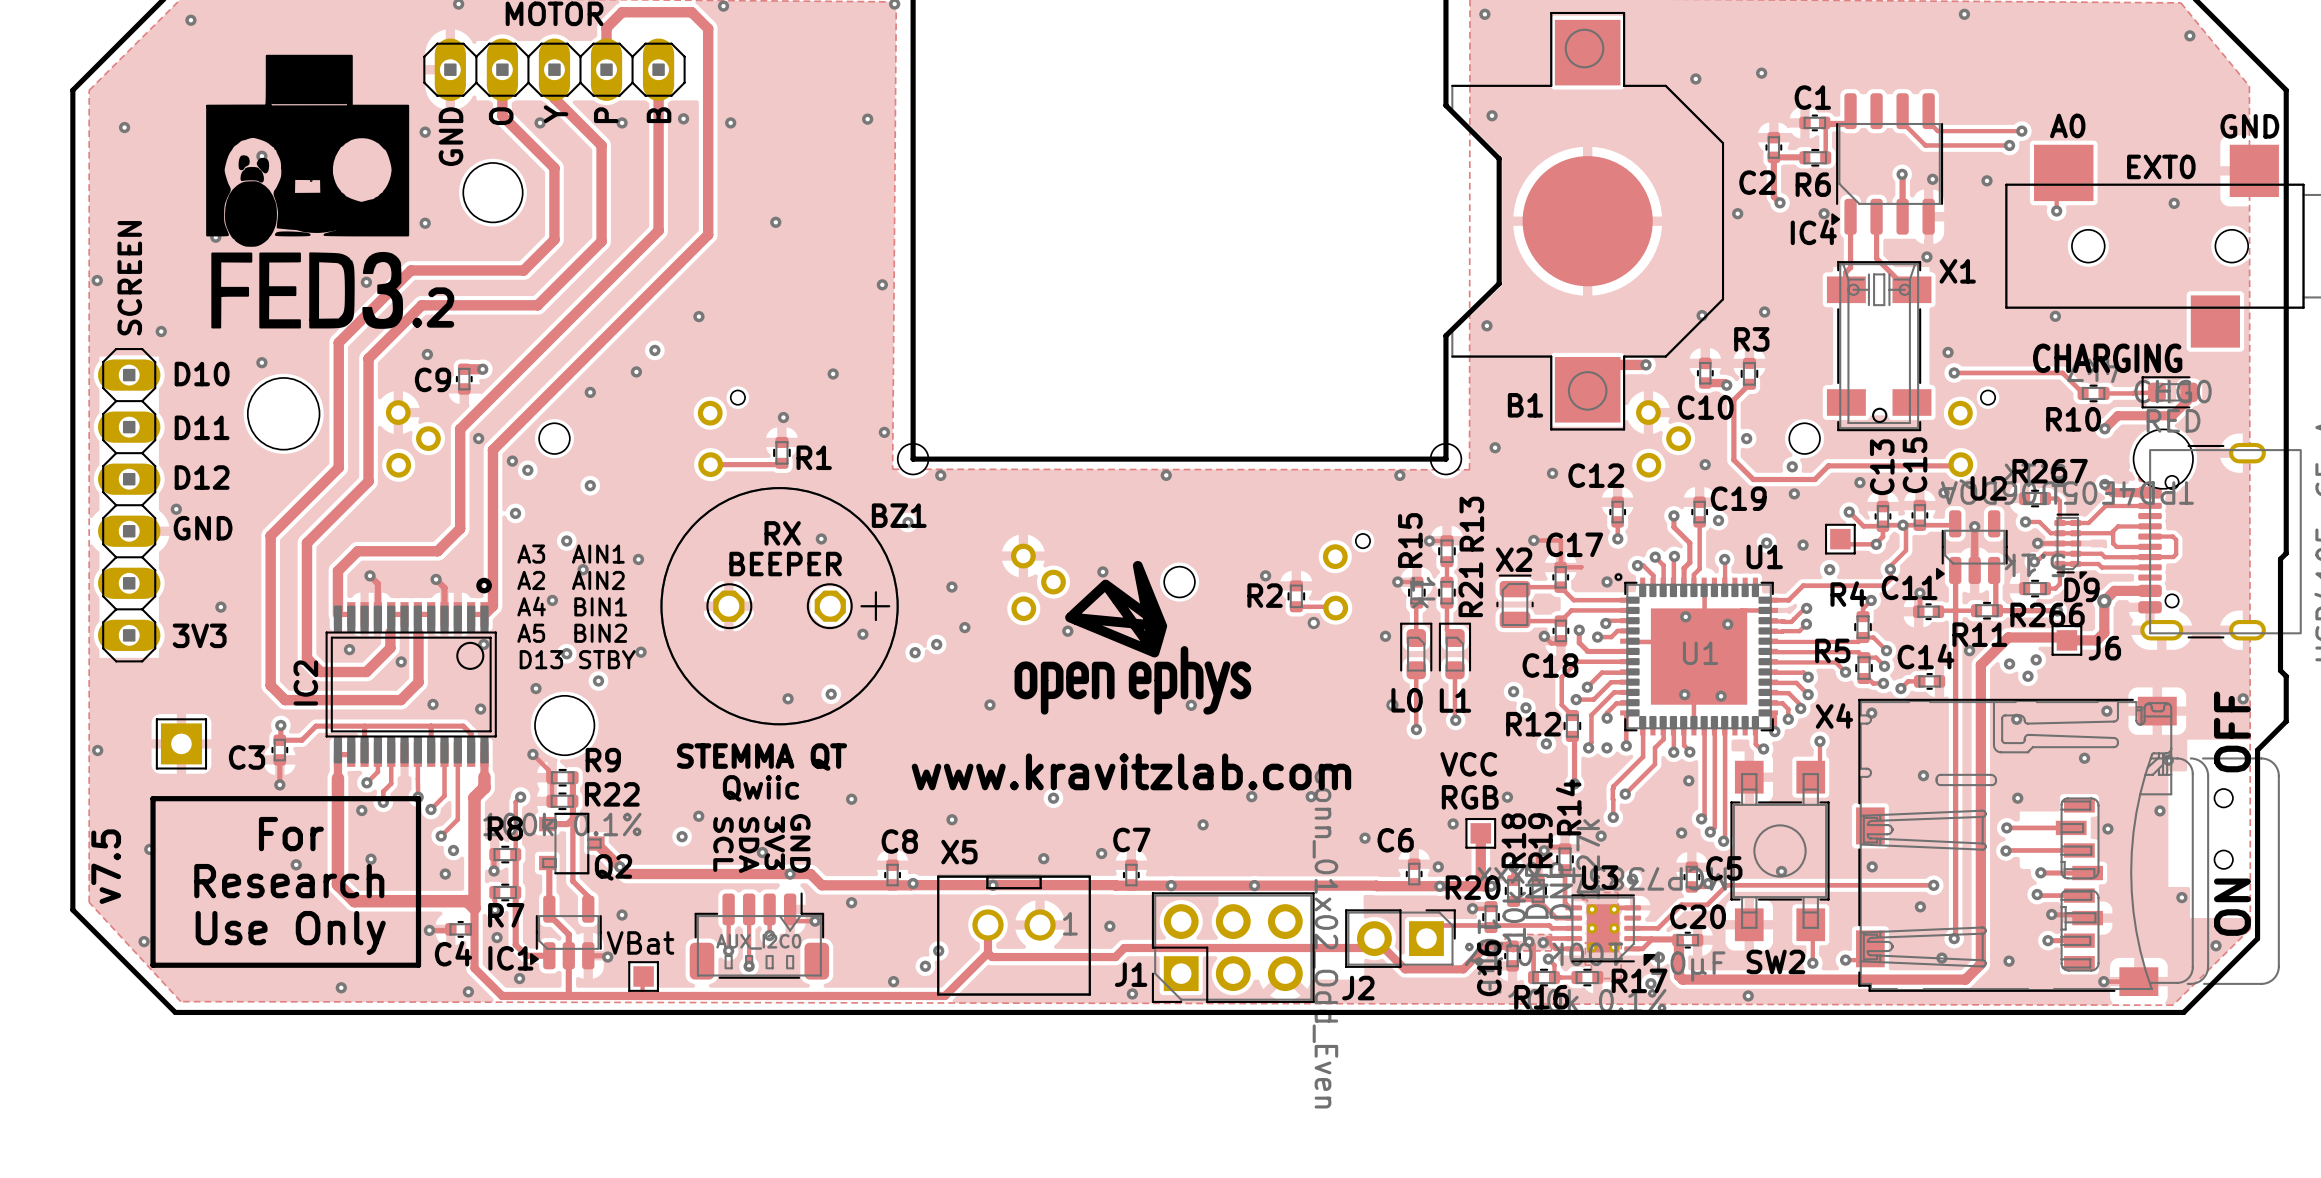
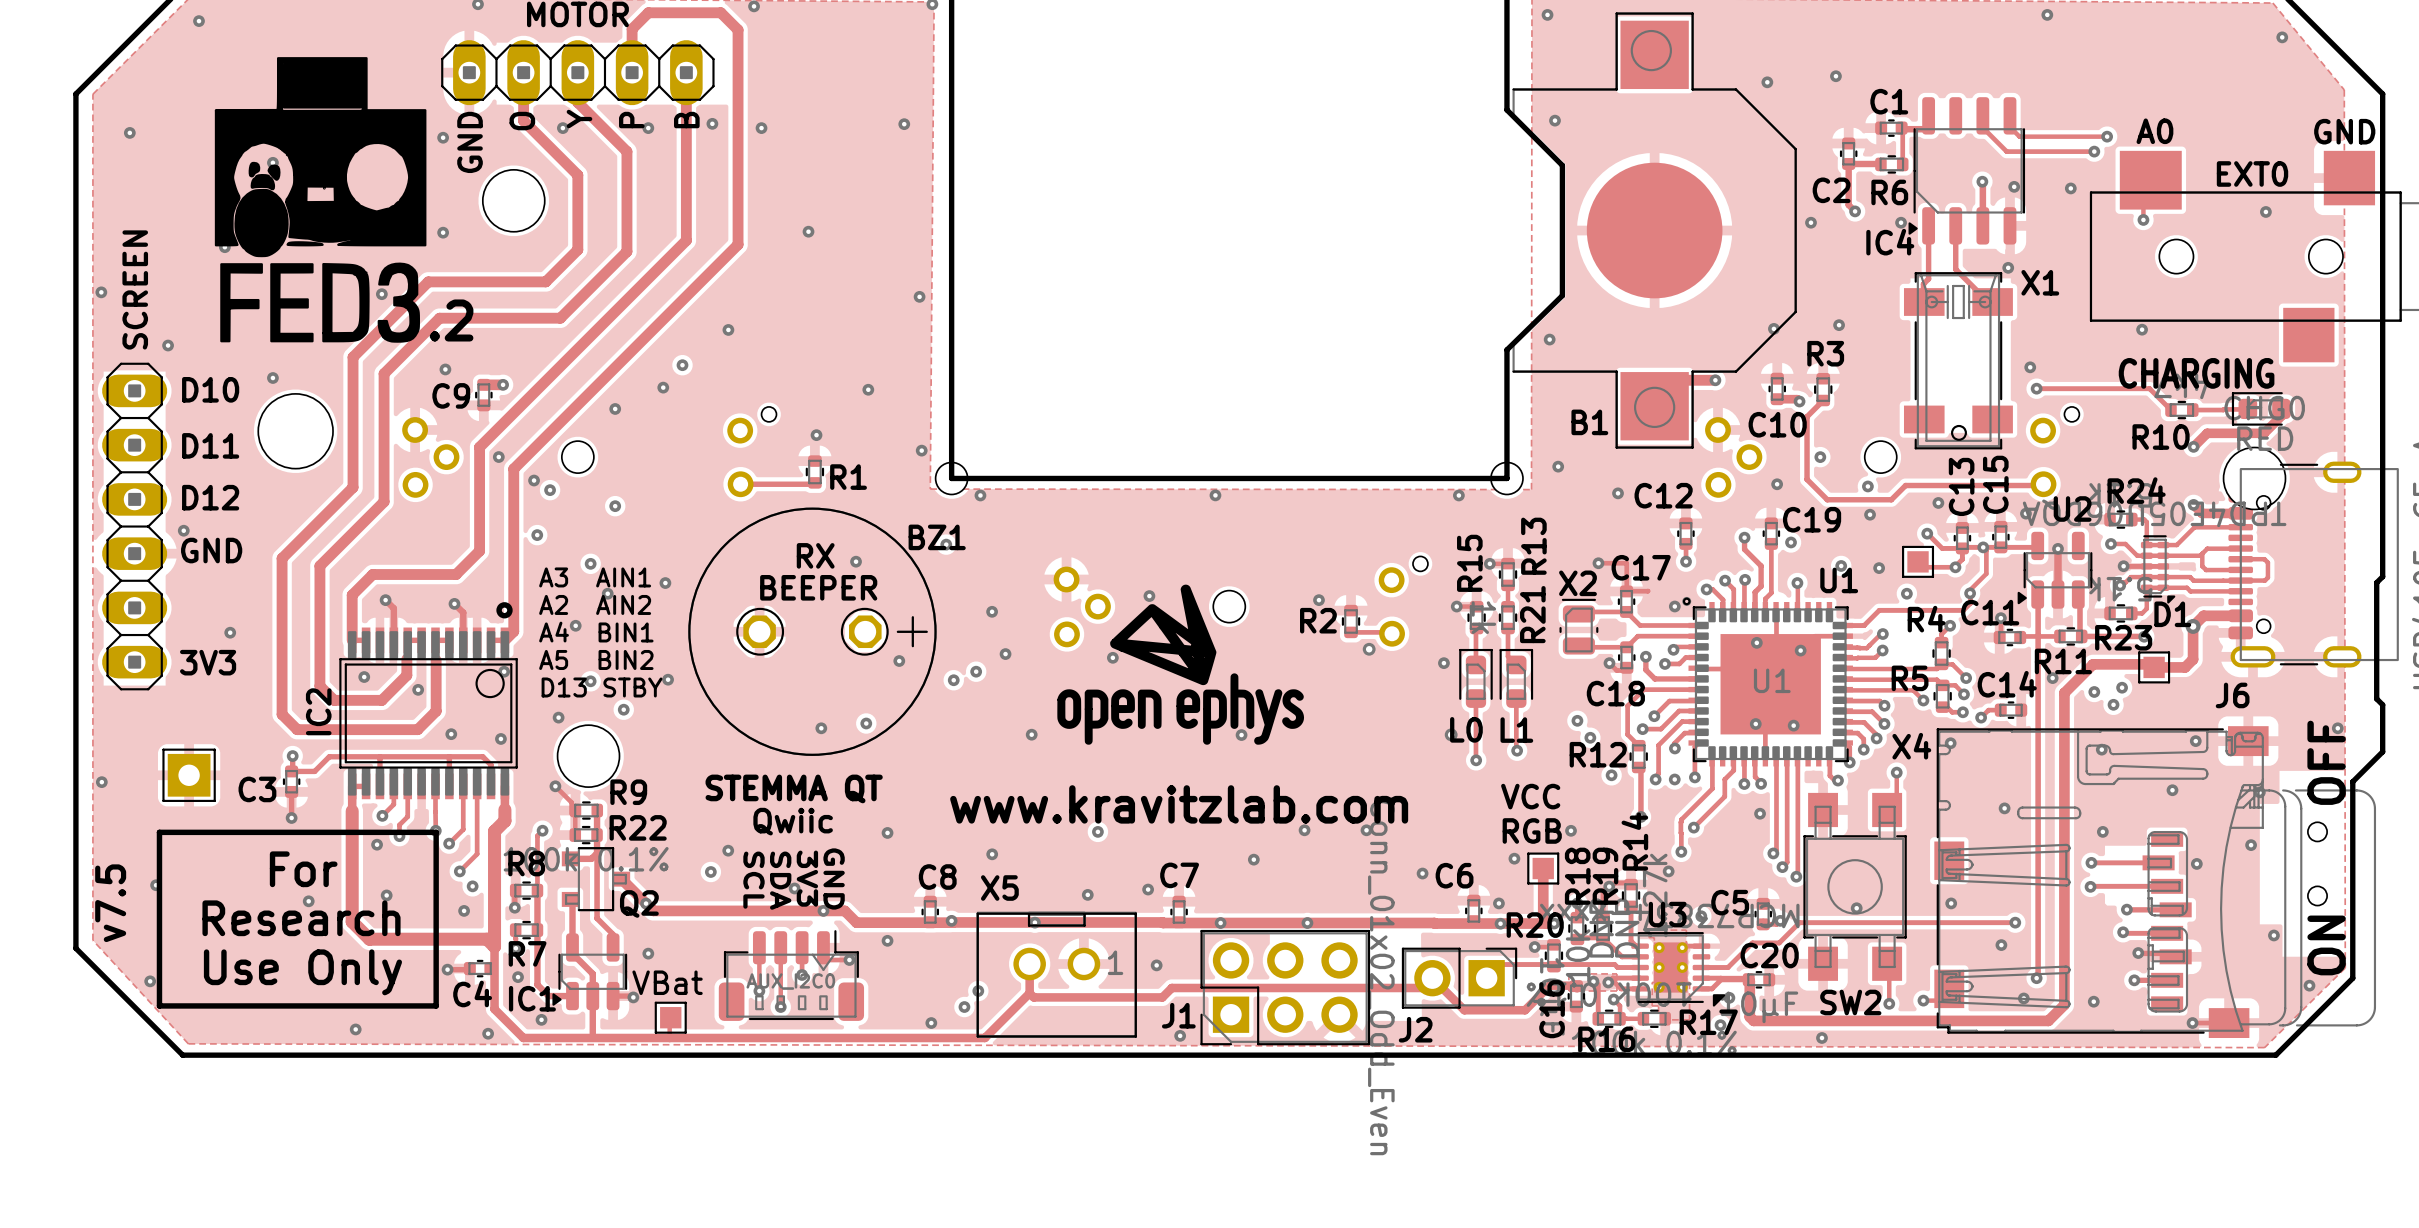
R267 name: R267 (2050, 471) -> R24 (2136, 490)
D9 name: D9 (2081, 589) -> D1 (2172, 614)
R266 name: R266 (2047, 614) -> R23 (2123, 637)
J6 name position: J6 (2104, 648) -> J6 (2232, 695)
via: (1681, 833) -> none
C5 name position: C5 (1724, 868) -> C5 (1730, 902)

